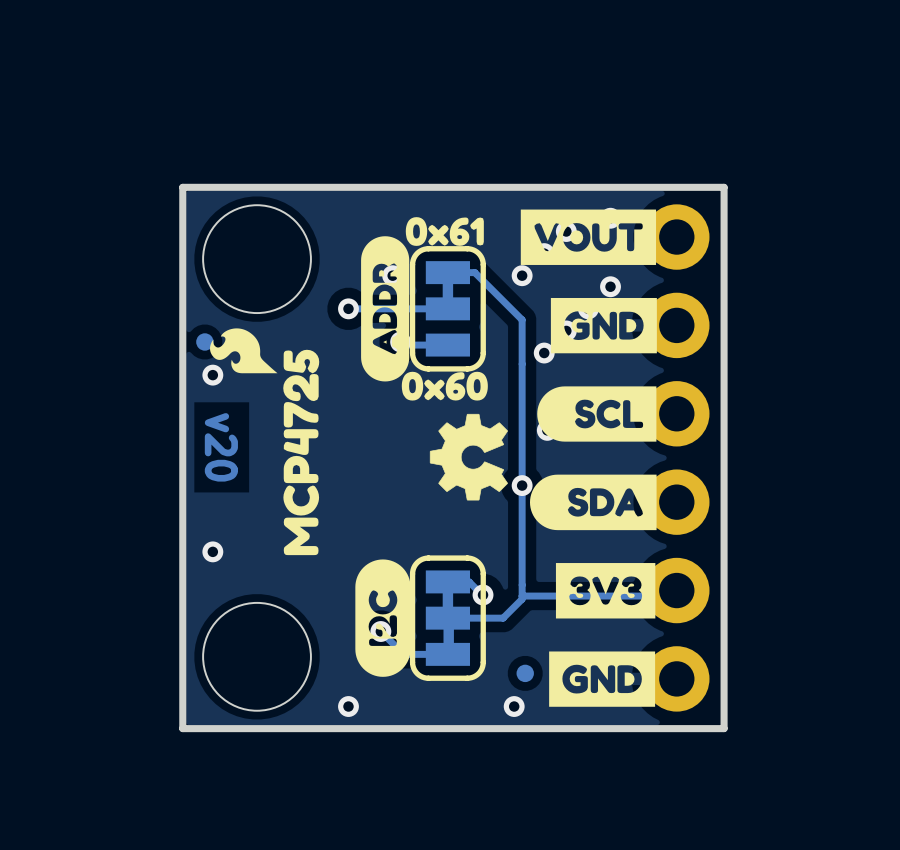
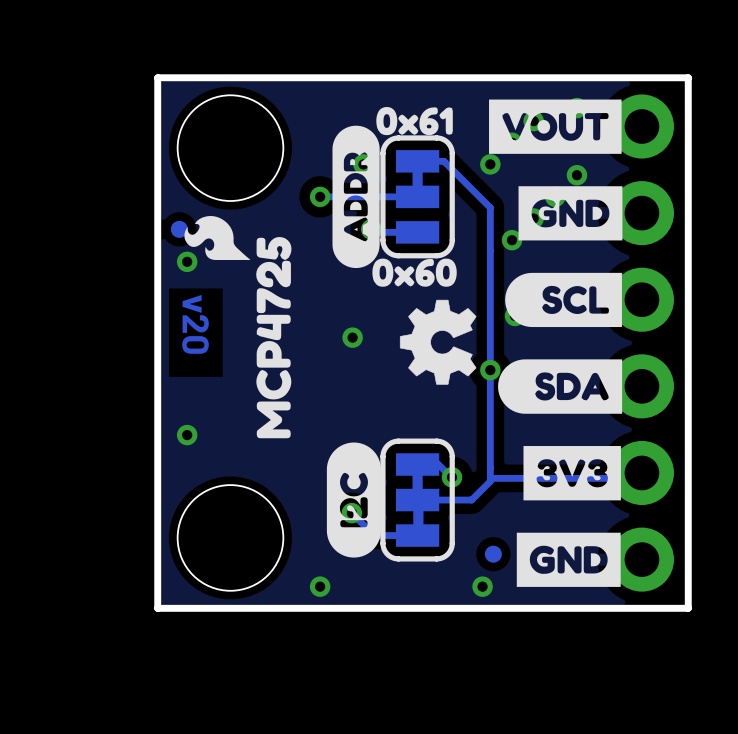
via: none -> (352, 337)

